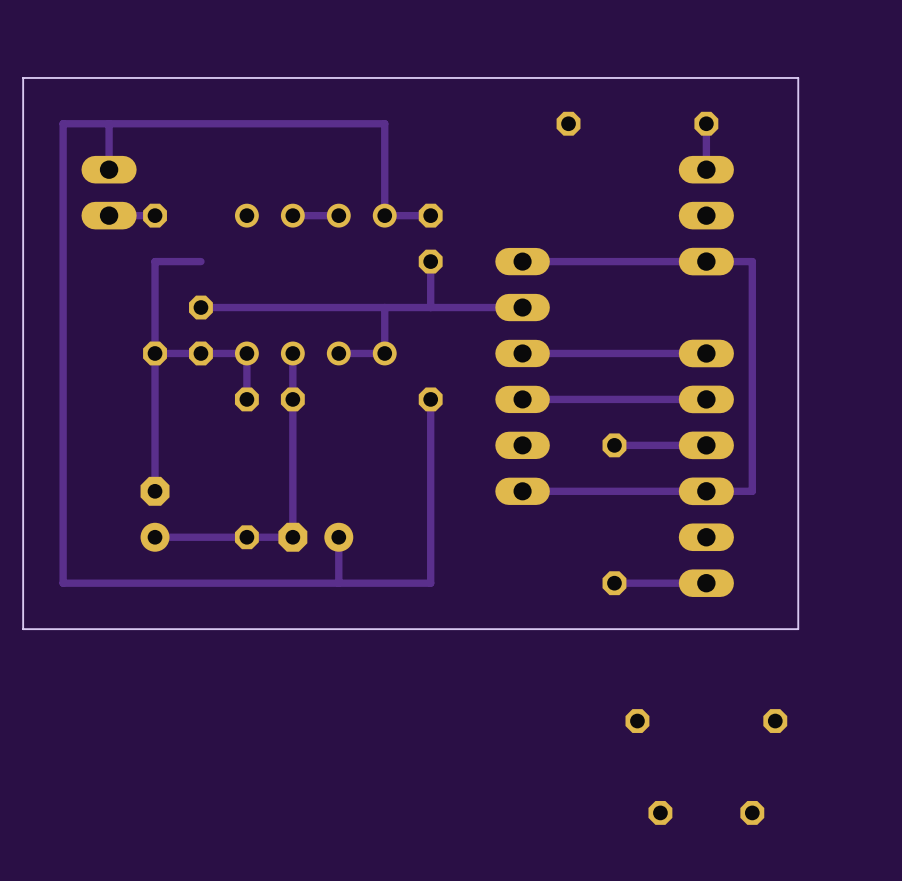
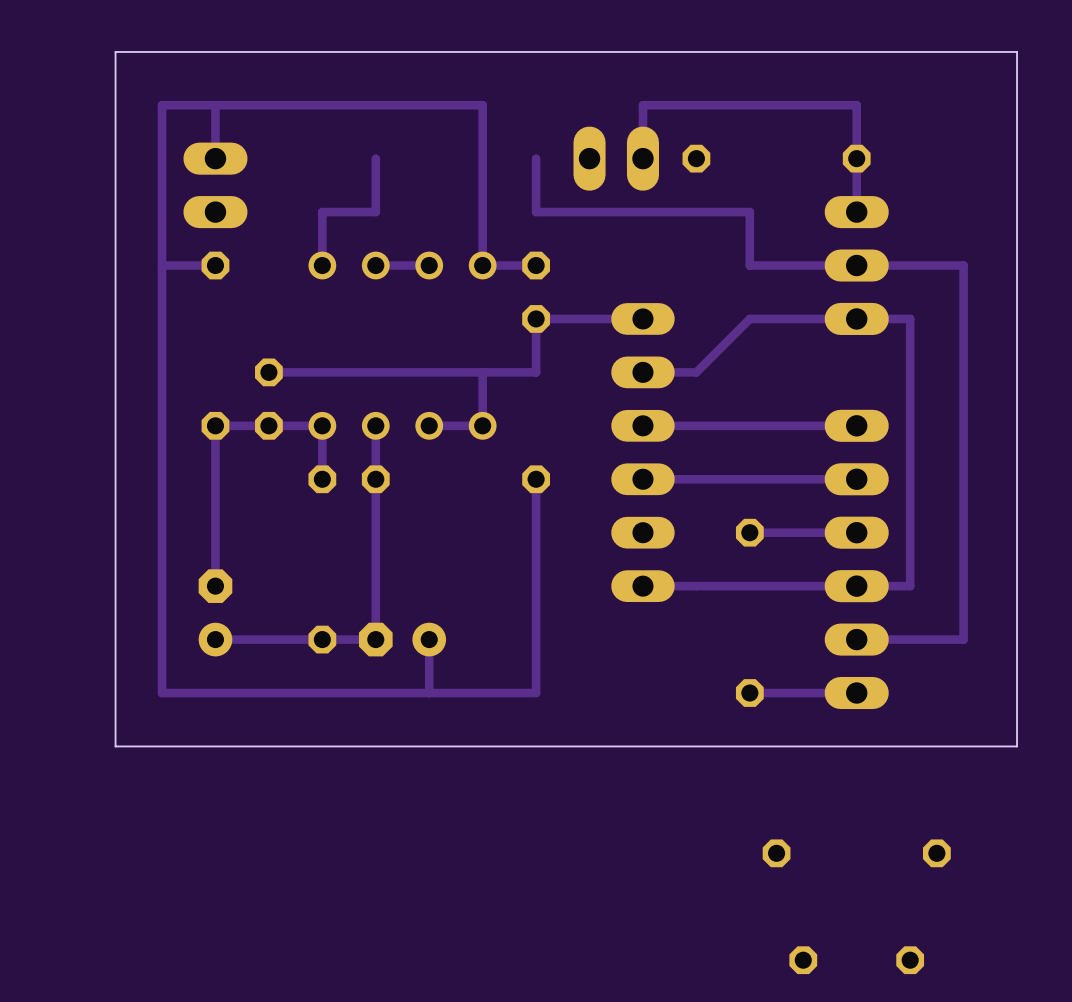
track: none -> (215, 105) (215, 158)
track: none -> (375, 158) (375, 212) (322, 212) (322, 265)
track: (384, 123) (63, 123) (63, 583) (109, 583) -> (162, 212) (162, 693)
track: none -> (482, 158) (482, 105) (162, 105) (162, 158)
track: none -> (536, 158) (536, 212) (749, 212) (749, 265) (963, 265) (963, 639) (856, 639)
part: none -> (616, 158)
track: none -> (856, 158) (856, 105) (642, 105) (642, 158)
part position: (109, 192) -> (215, 185)
track: (200, 261) (155, 261) (155, 353) -> none
track: (614, 261) (522, 261) -> (749, 318) (696, 372) (642, 372)
track: (522, 307) (430, 307) -> (642, 318) (536, 318)
board edge: (798, 629) (798, 77) (23, 77) (23, 629) (69, 629) -> (963, 746) (1017, 746) (1017, 51) (115, 51) (115, 746)

